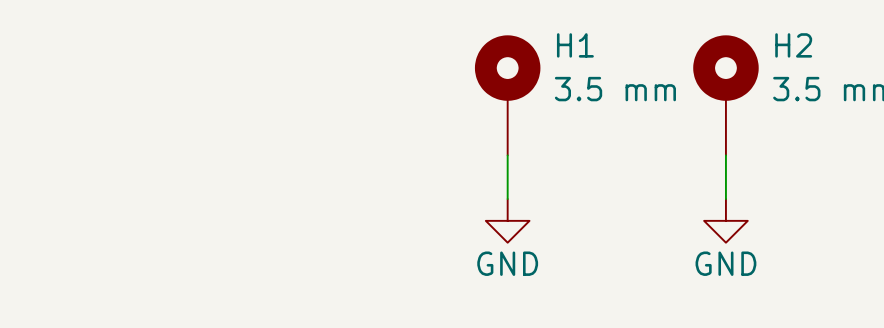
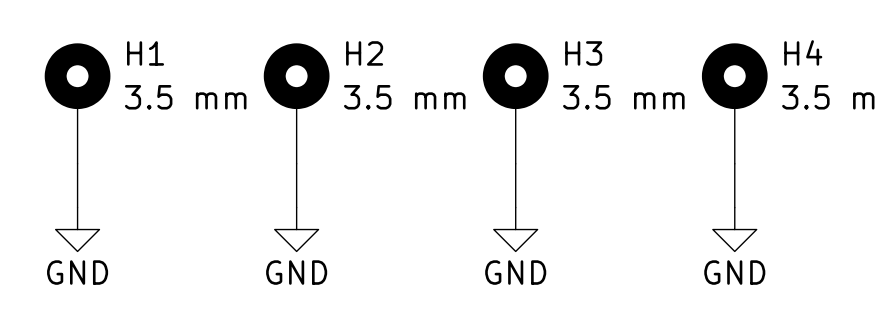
H1 name: H1 (575, 45) -> H3 (583, 53)
H2 name: H2 (793, 45) -> H4 (803, 52)
H1: none -> (77, 103)
H2: none -> (296, 103)
wire: none -> (77, 163) (77, 207)
wire: none -> (296, 163) (296, 207)
power symbol: none -> GND (77, 229)
power symbol: none -> GND (296, 229)

